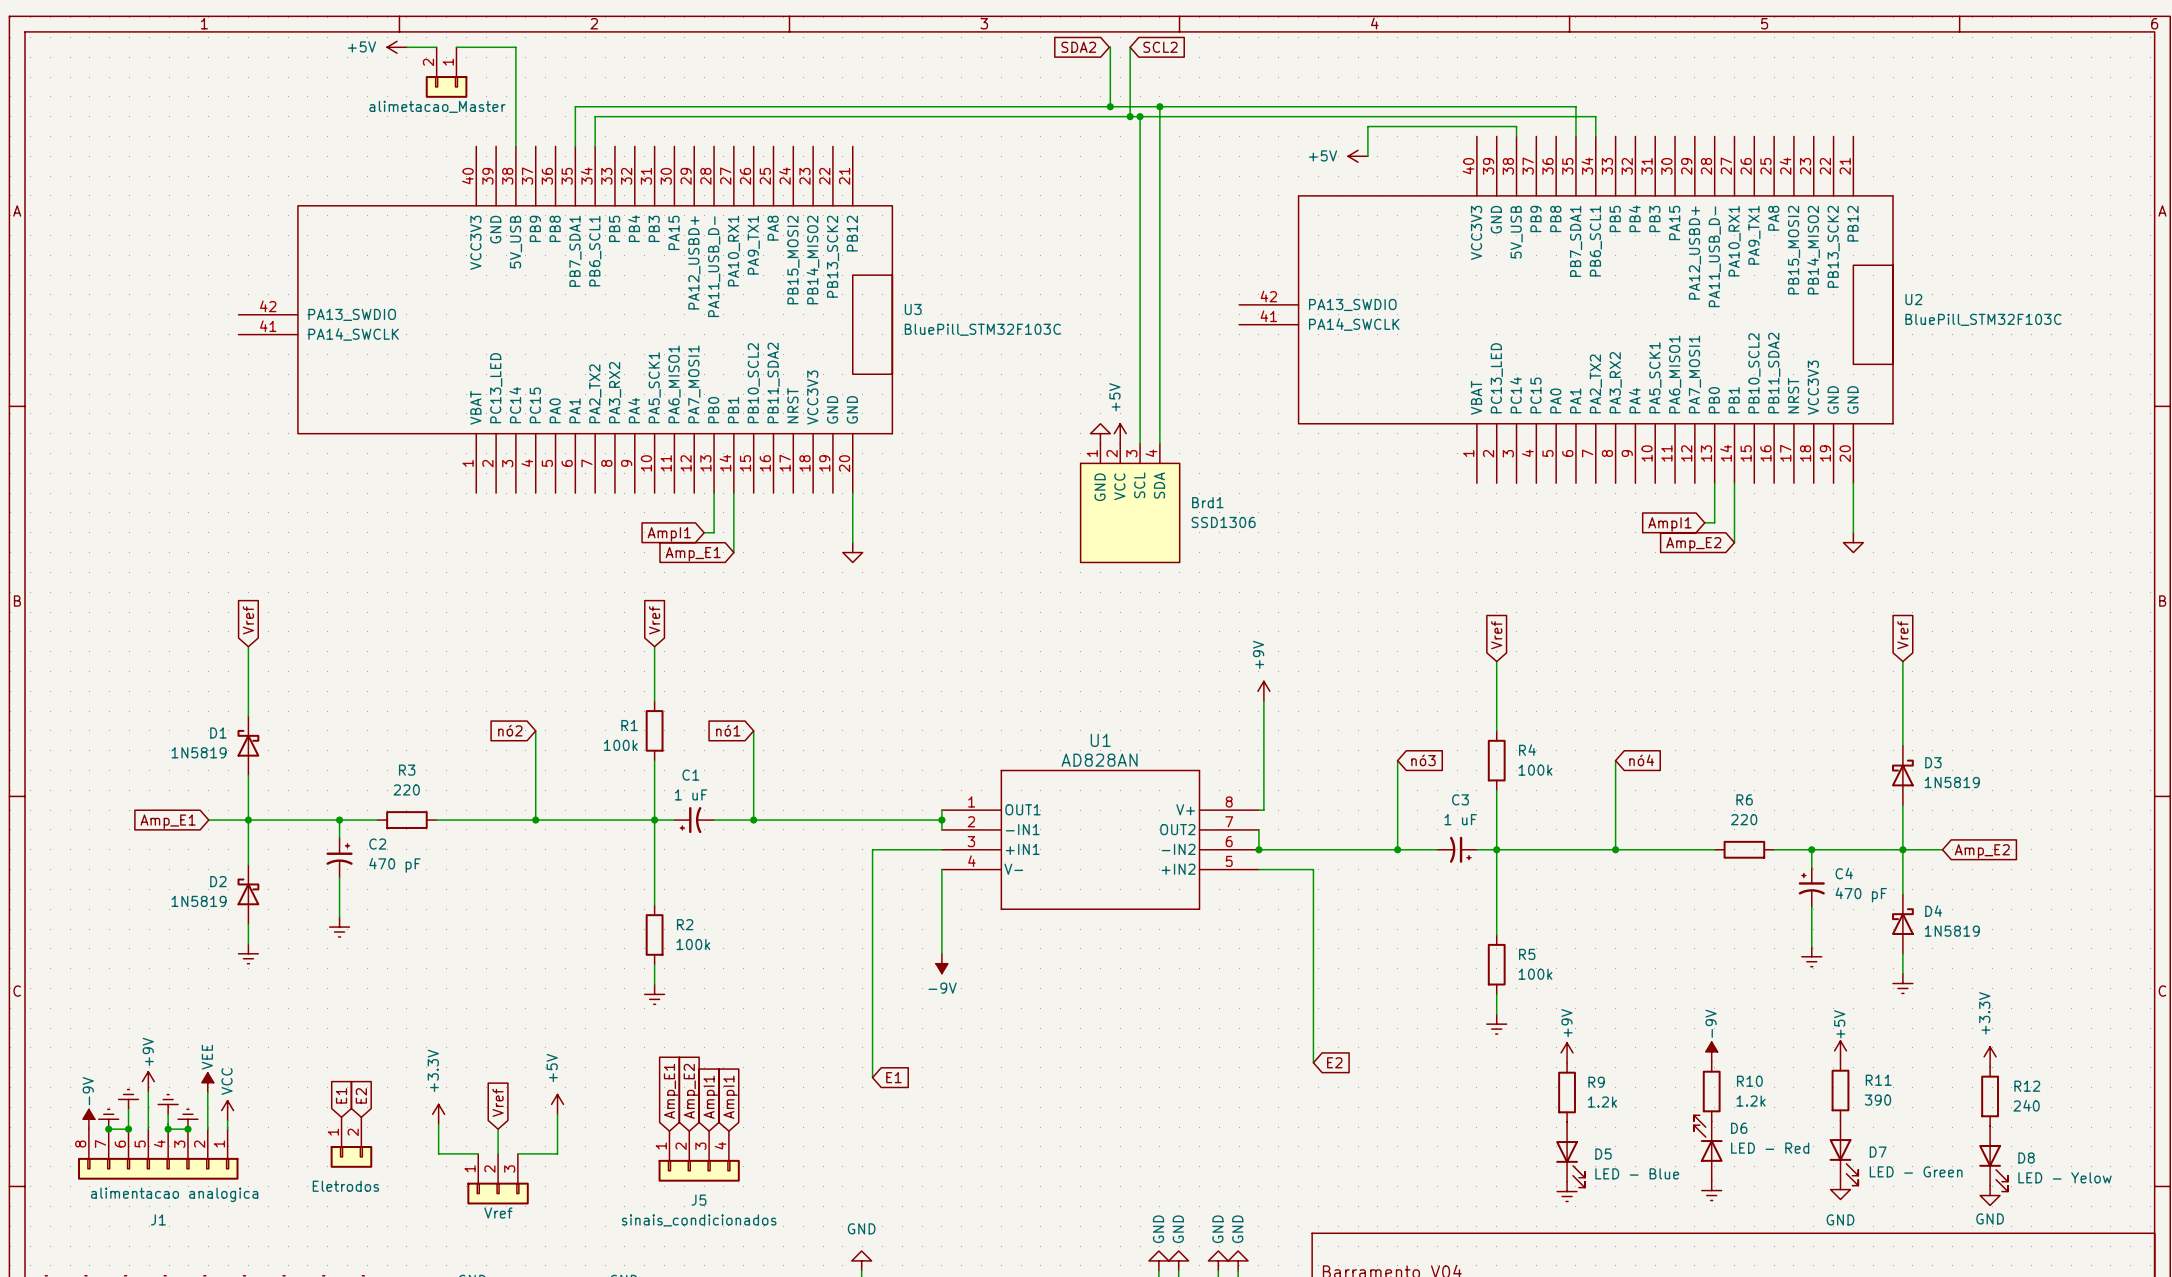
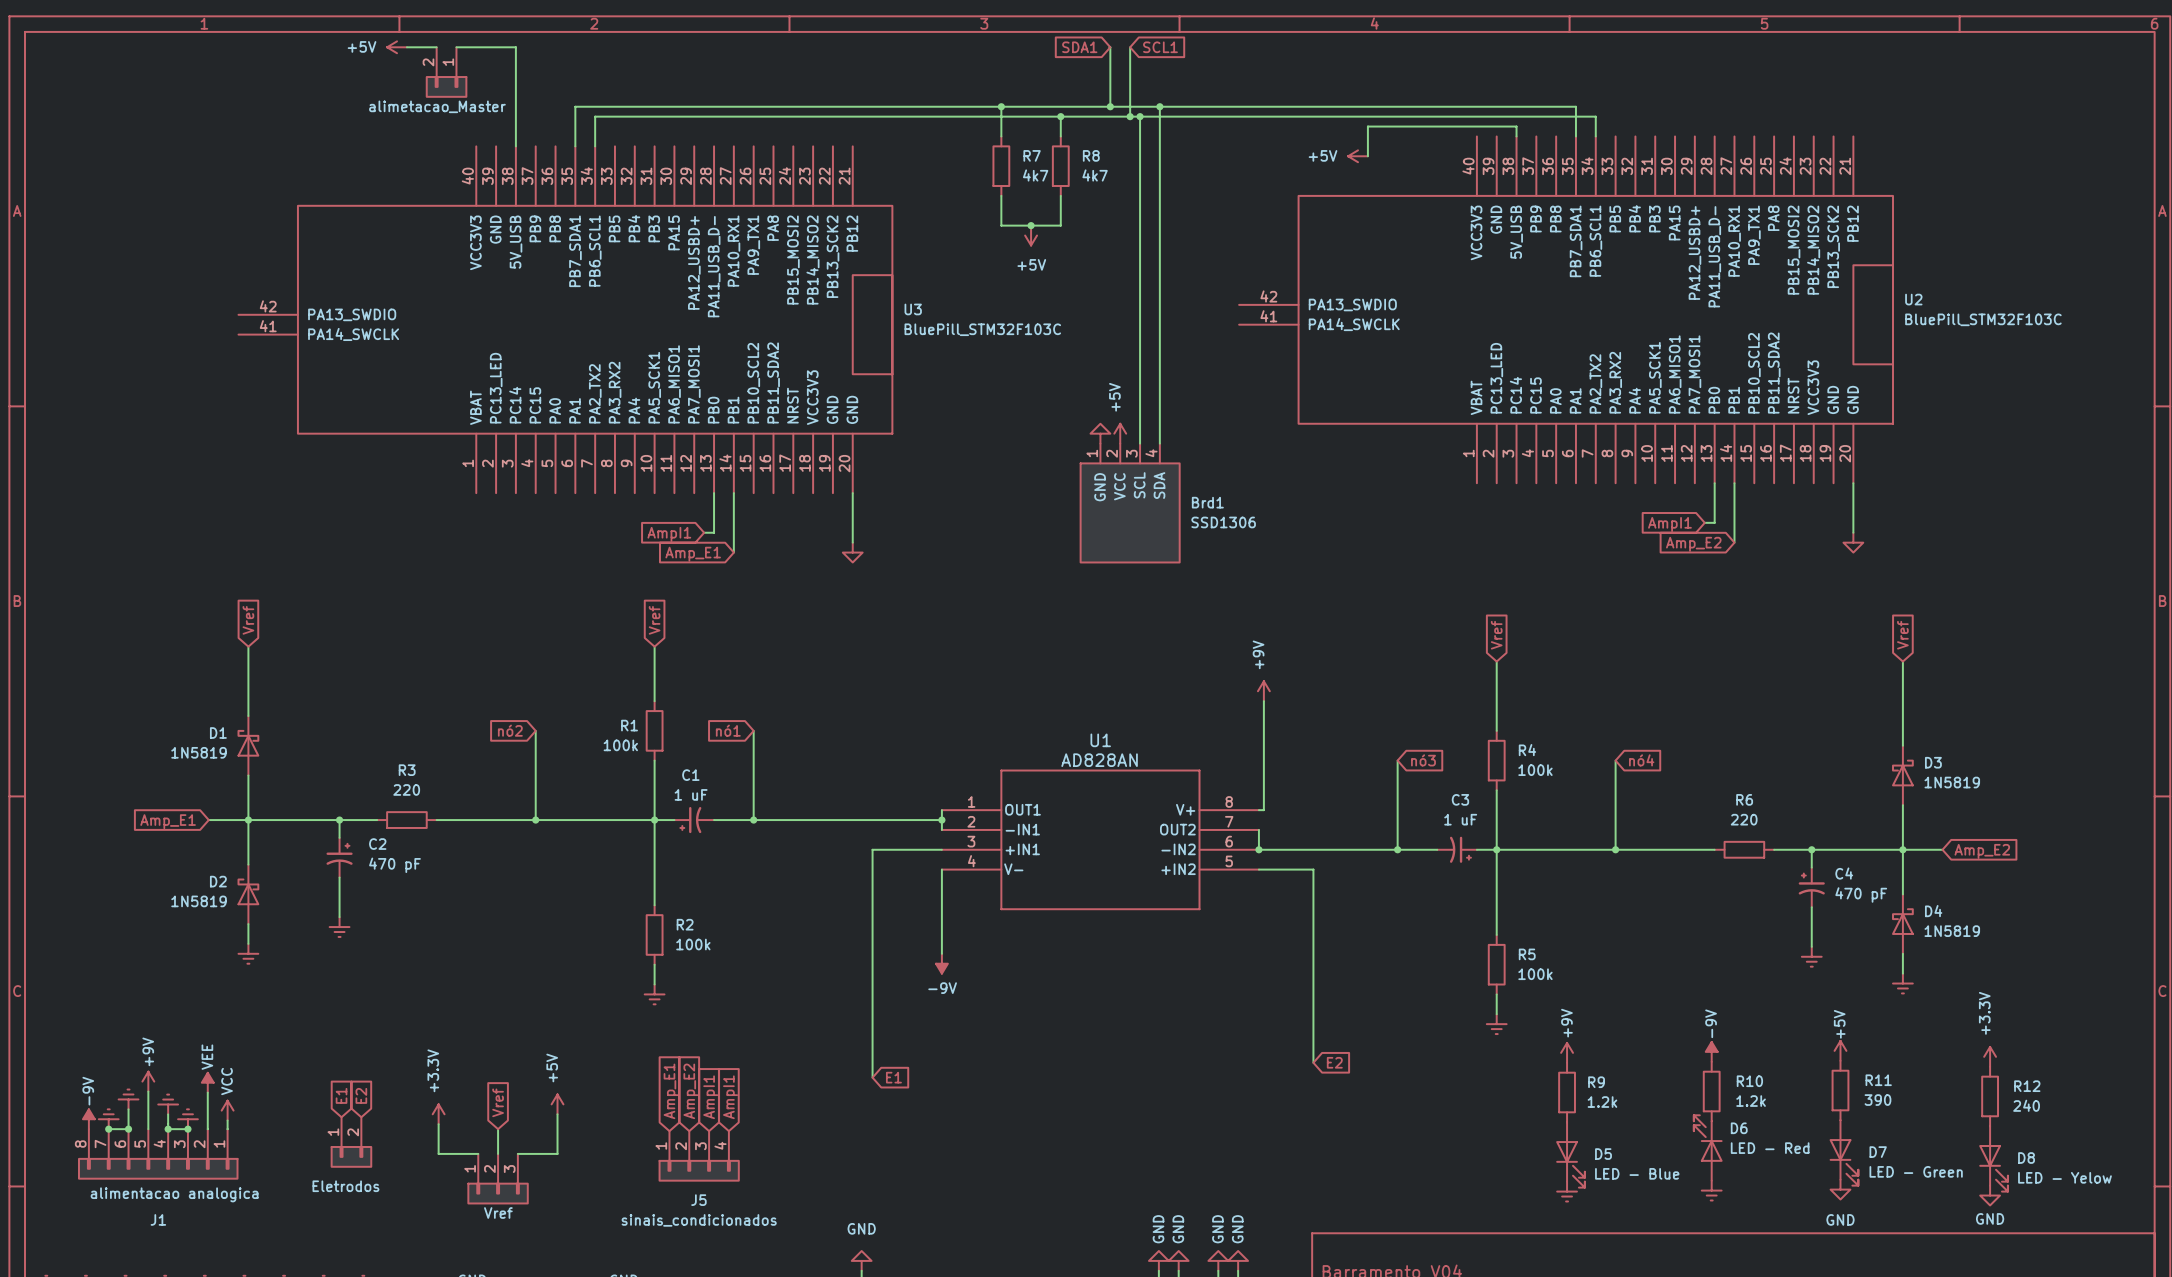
global label: SDA2 (1078, 47) -> SDA1 (1079, 47)
global label: SCL2 (1160, 47) -> SCL1 (1160, 47)
wire: none -> (1001, 106) (1001, 136)
junction: none -> (1001, 106)
wire: none -> (1060, 116) (1060, 136)
junction: none -> (1060, 116)
R7: none -> 4k7 (1001, 166)
R8: none -> 4k7 (1060, 166)
wire: none -> (1001, 195) (1001, 225) (1060, 225) (1060, 195)
junction: none -> (1031, 225)
power symbol: none -> +5V (1031, 235)

